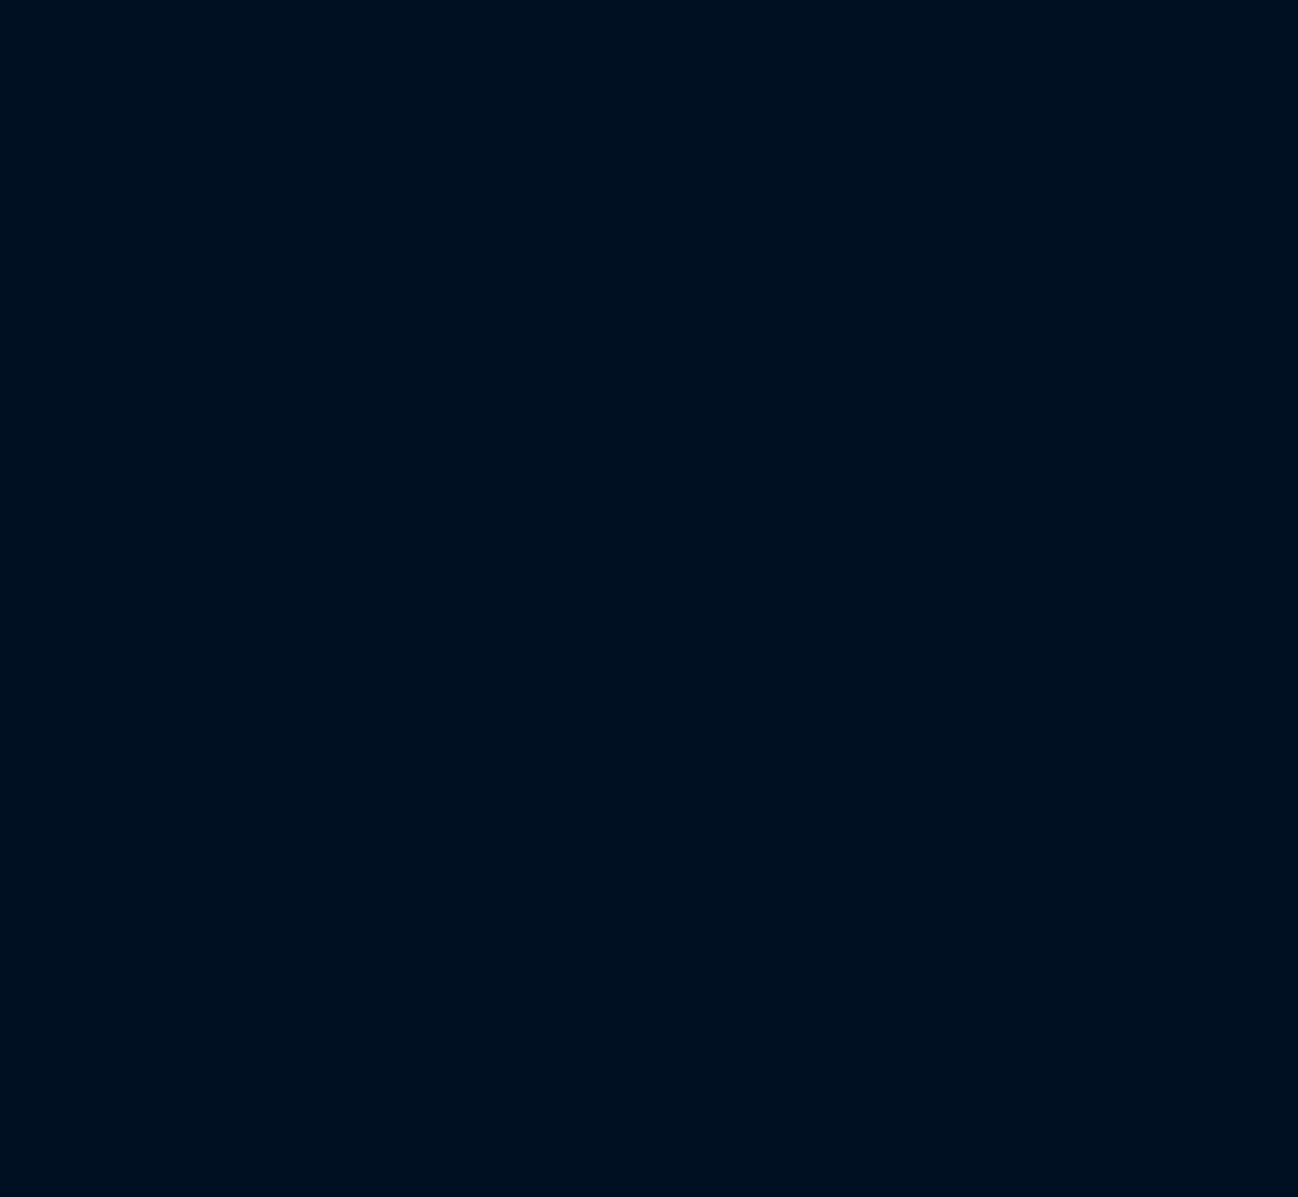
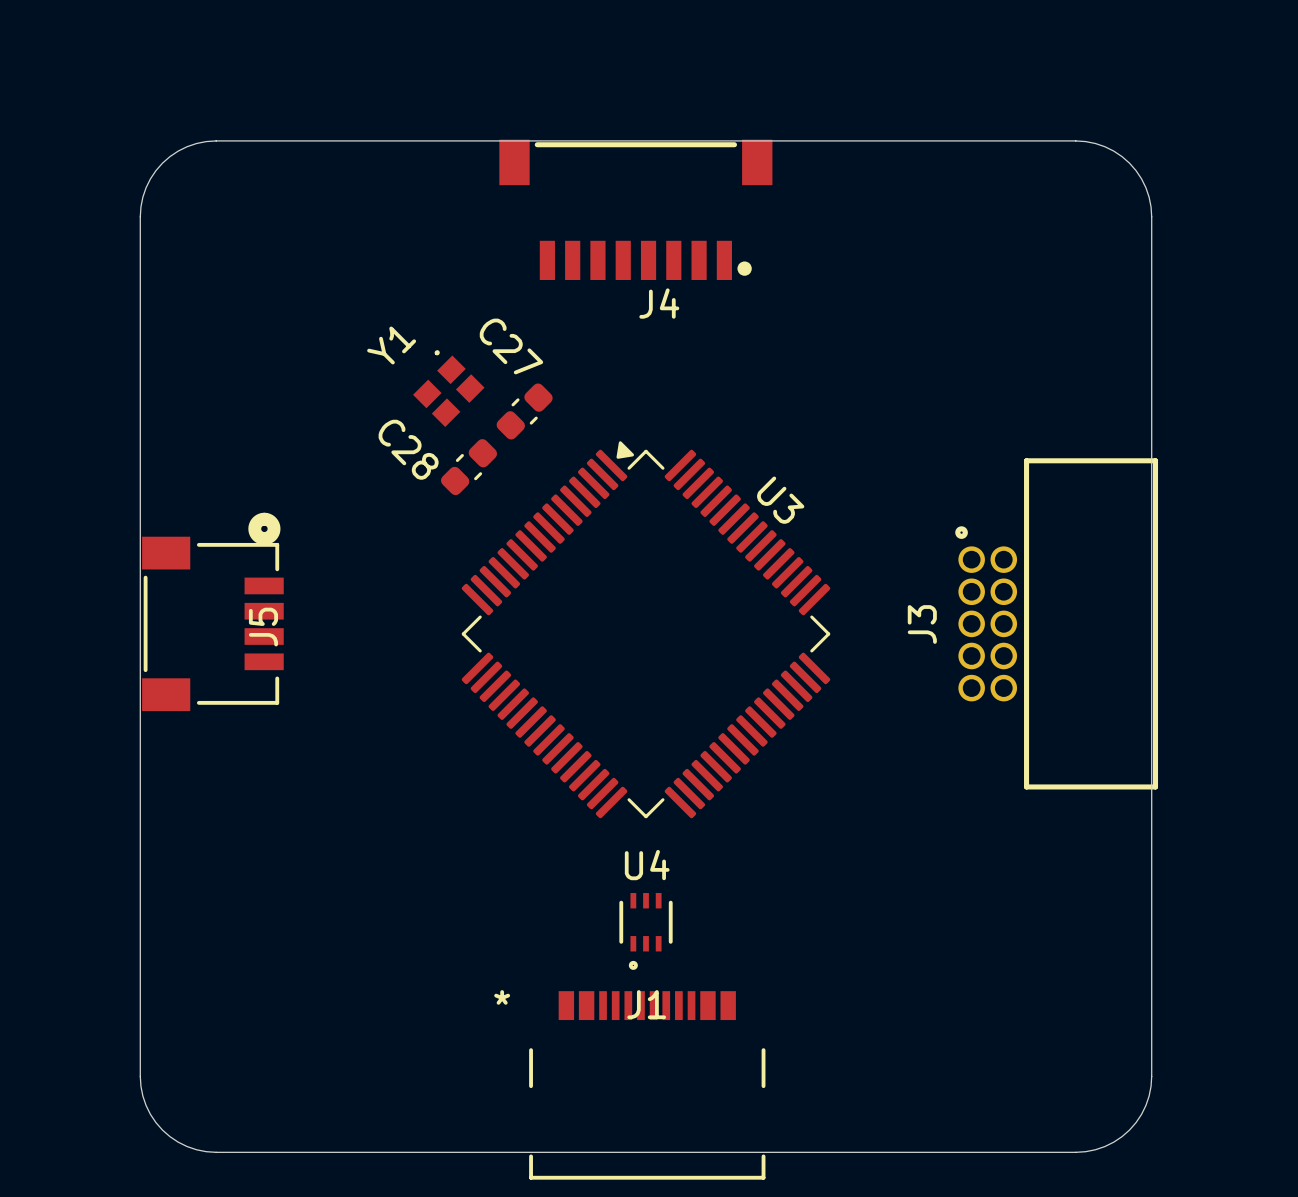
board edge: none -> (216, 140) (1075, 140) (1104, 146) (1129, 163) (1145, 187) (1151, 216) (1151, 1076) (1145, 1105) (1129, 1130) (1104, 1146) (1075, 1152) (216, 1152) (187, 1146) (162, 1130) (146, 1105) (140, 1076) (140, 216) (146, 187) (162, 163) (187, 146) (216, 140)
J4: none -> (635, 209)
Y1: none -> (448, 388)
C27: none -> (524, 411)
C28: none -> (469, 467)
J5: none -> (212, 611)
J3: none -> (1056, 623)
U3: none -> (646, 629)
U4: none -> (646, 931)
J1: none -> (647, 1085)

